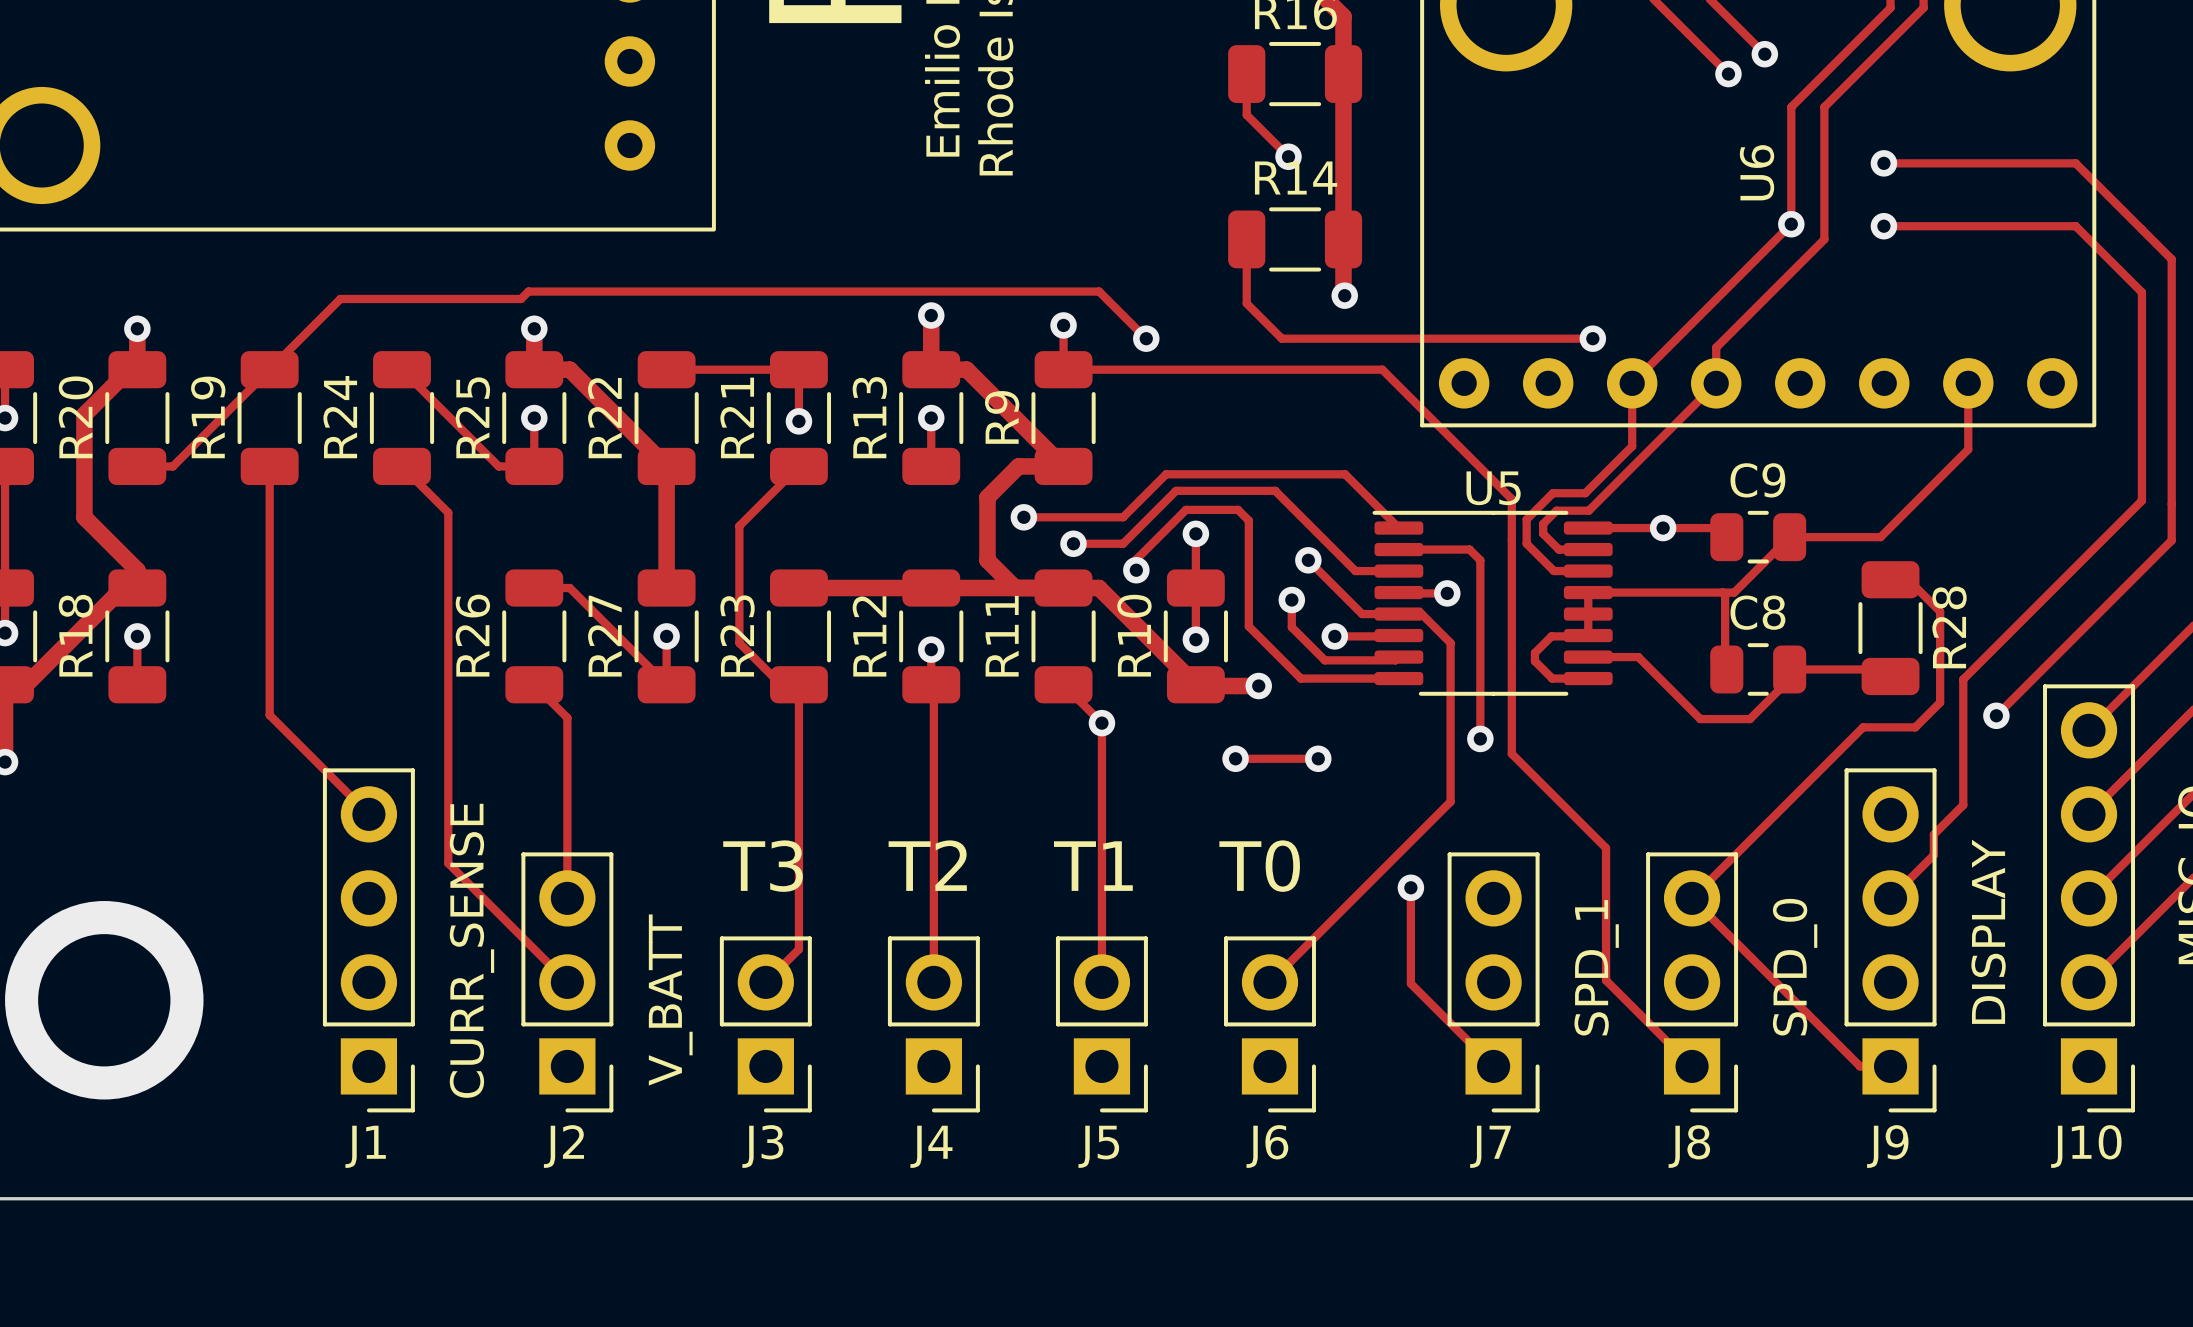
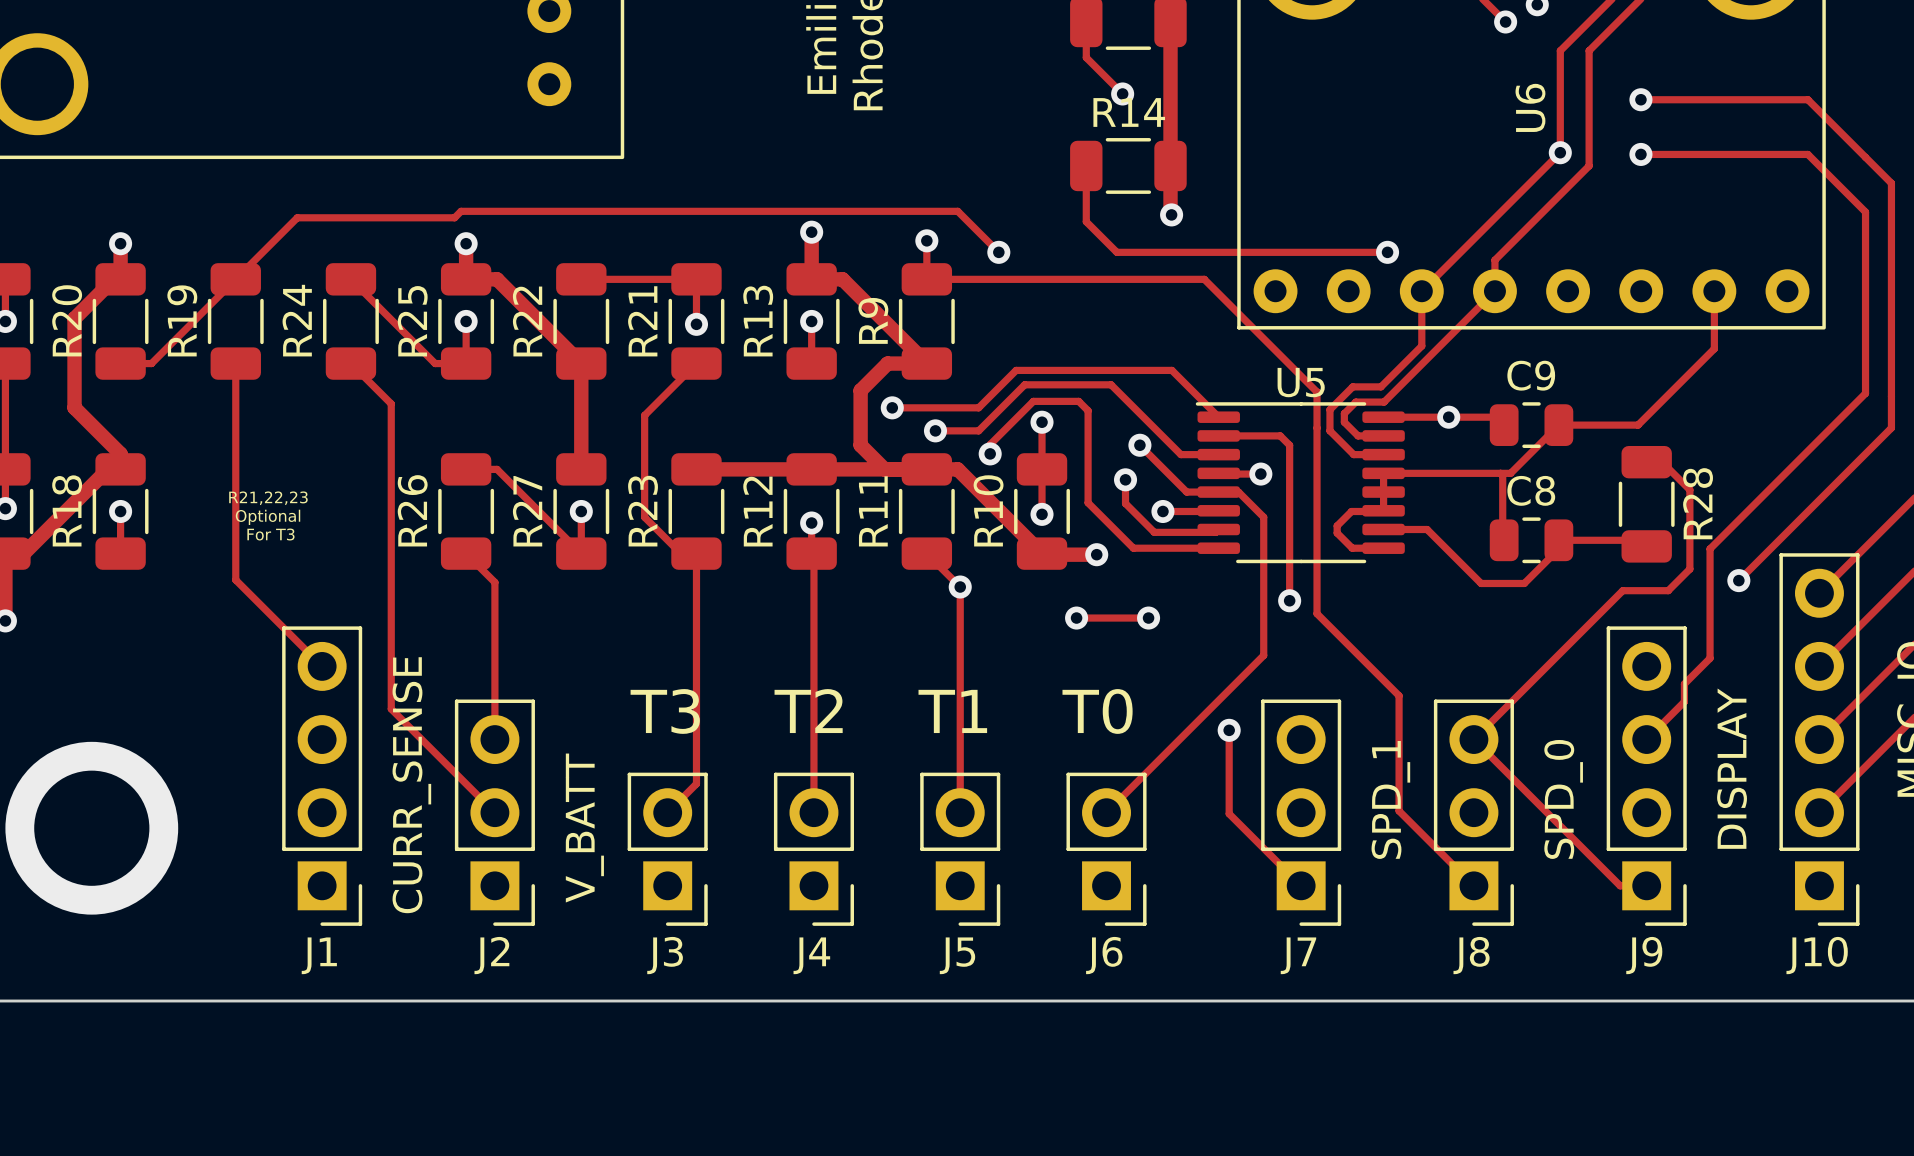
text: none -> R21,22,23 (268, 498)
text: none -> Optional (268, 517)
text: none -> For T3 (270, 534)

